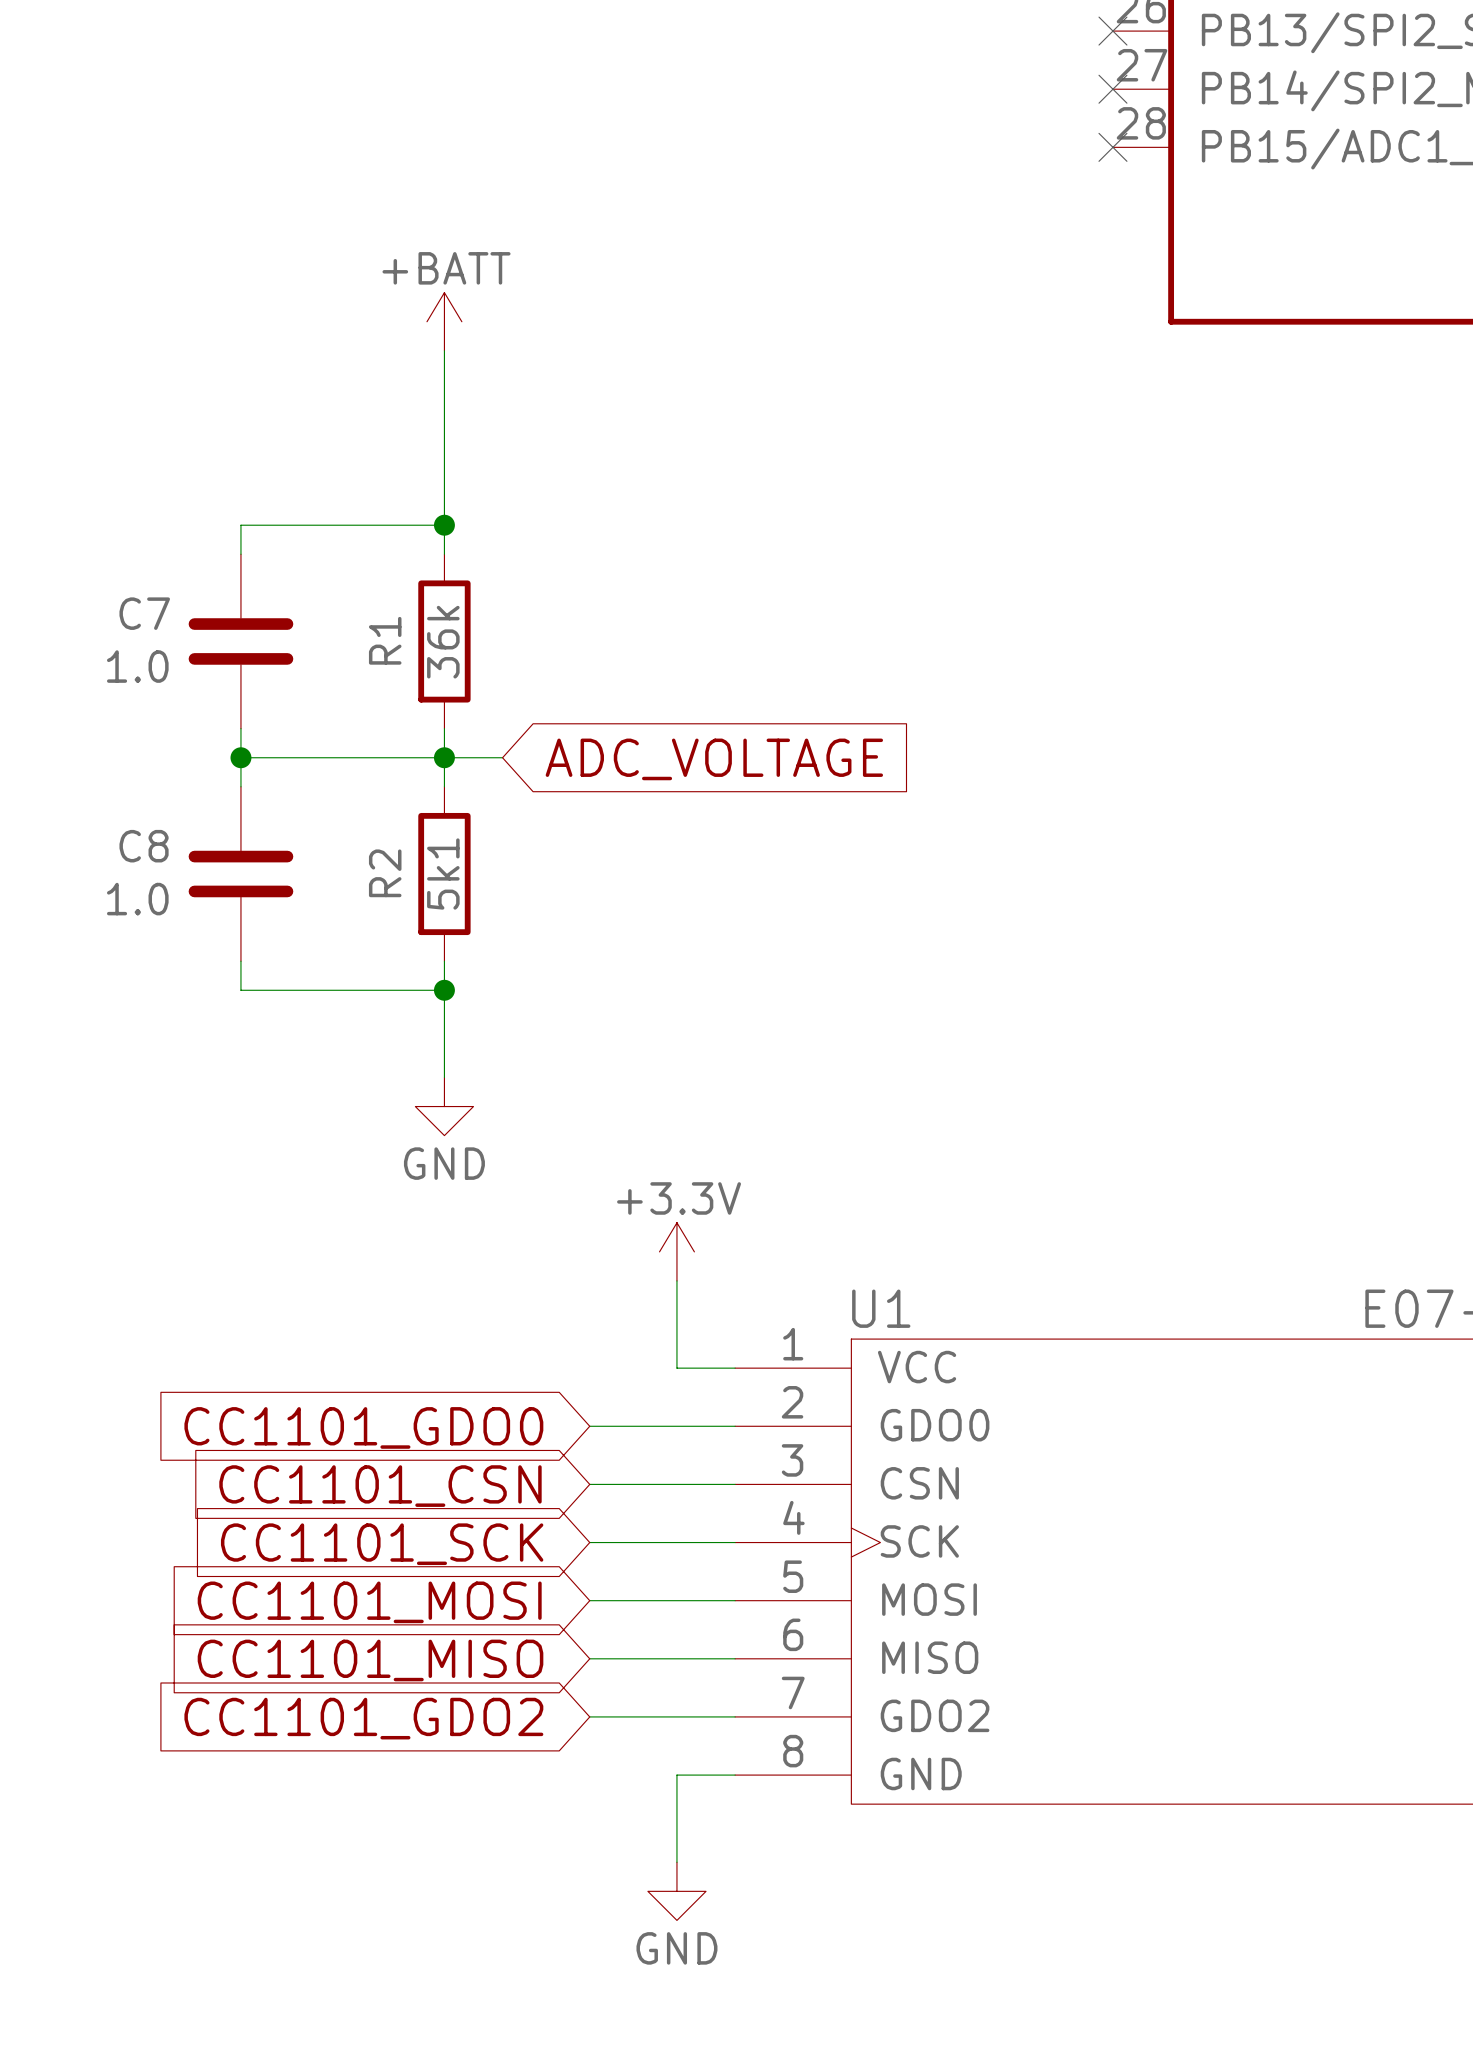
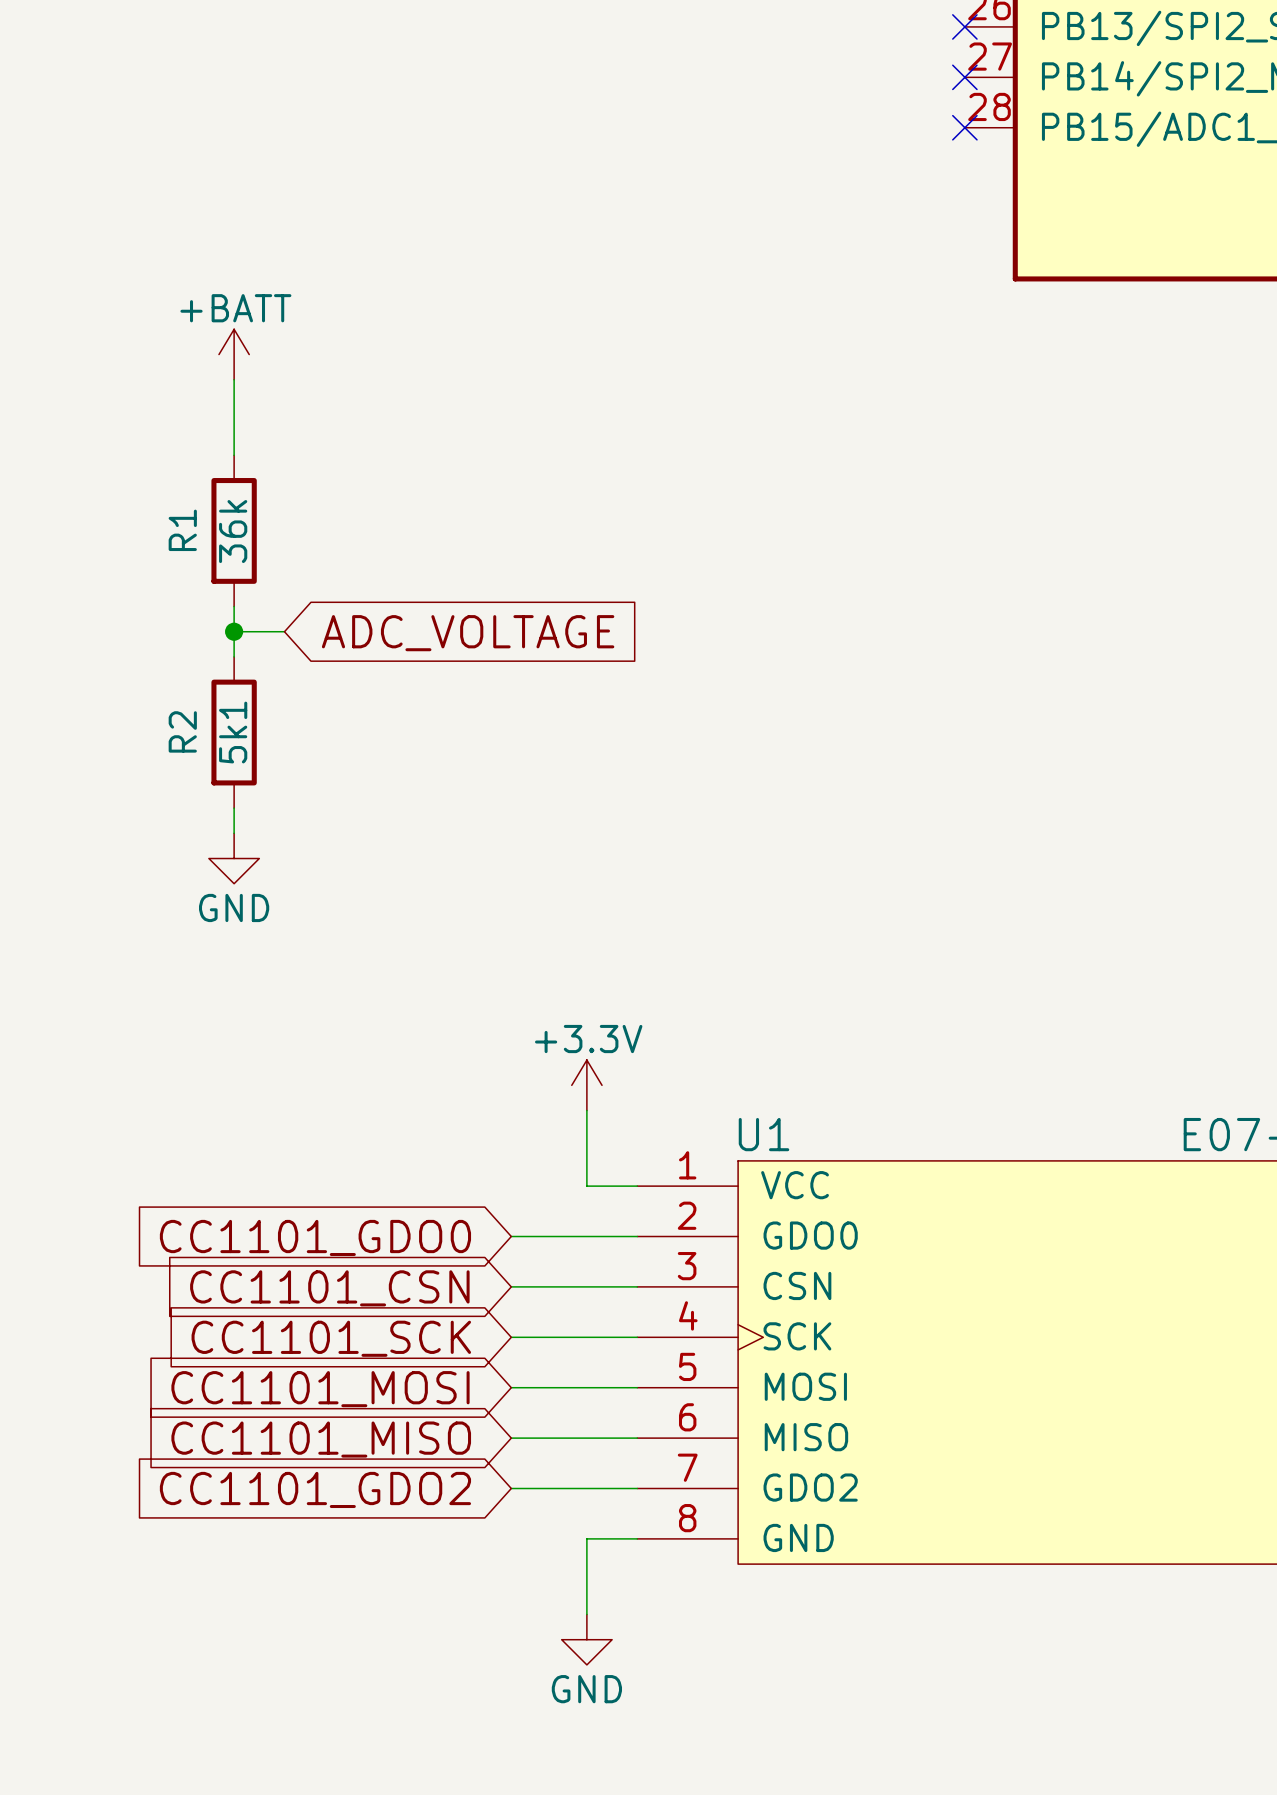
power symbol position: +BATT (444, 321) -> +BATT (234, 354)
wire: (444, 350) (444, 554) -> none
wire: none -> (234, 379) (234, 455)
wire: (444, 525) (240, 525) (240, 554) -> none
junction: (444, 525) -> none
C7: 1.0 (240, 641) -> none
R1 position: (444, 641) -> (234, 530)
wire: (240, 728) (240, 786) -> (234, 606) (234, 656)
wire: none -> (234, 631) (284, 631)
wire: (444, 728) (444, 786) -> none
wire: (240, 757) (502, 757) -> none
junction position: (240, 757) -> (234, 631)
junction: (444, 757) -> none
global label position: ADC_VOLTAGE (714, 759) -> ADC_VOLTAGE (468, 633)
C8: 1.0 (240, 874) -> none
R2 position: (444, 874) -> (234, 732)
wire: none -> (234, 808) (234, 833)
wire: (240, 961) (240, 990) (444, 990) -> none
wire: (444, 961) (444, 1077) -> none
junction: (444, 990) -> none
power symbol position: GND (444, 1106) -> GND (234, 858)

